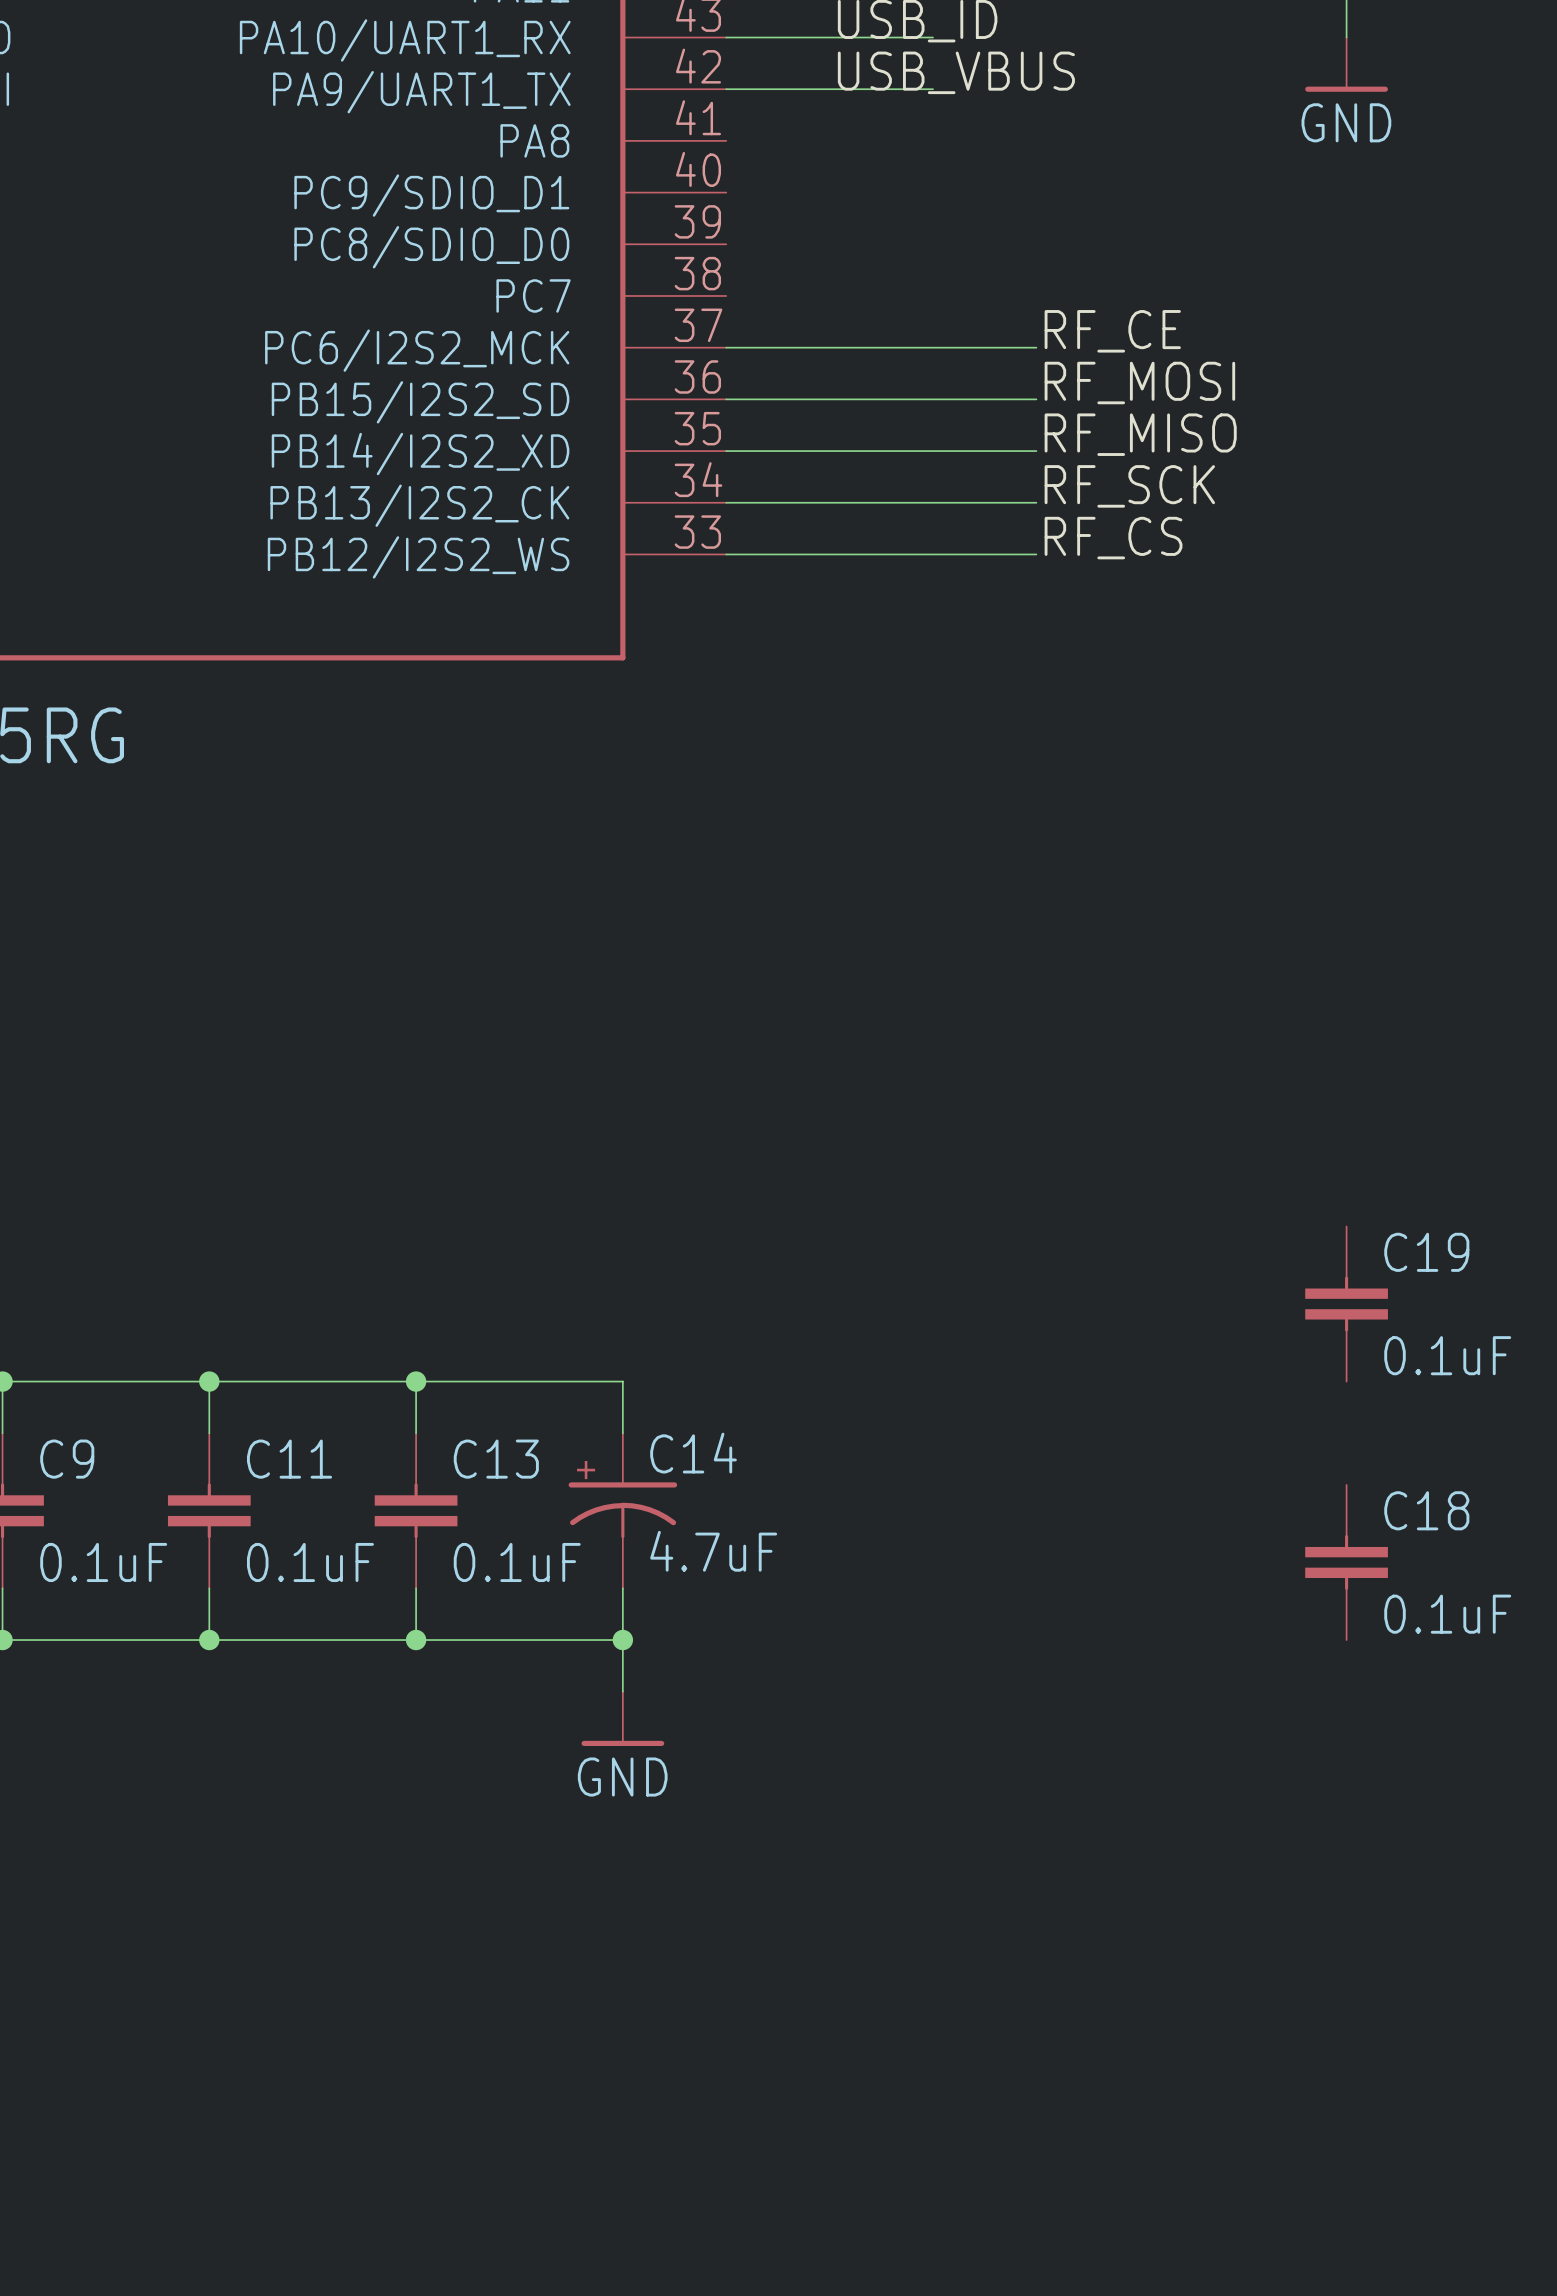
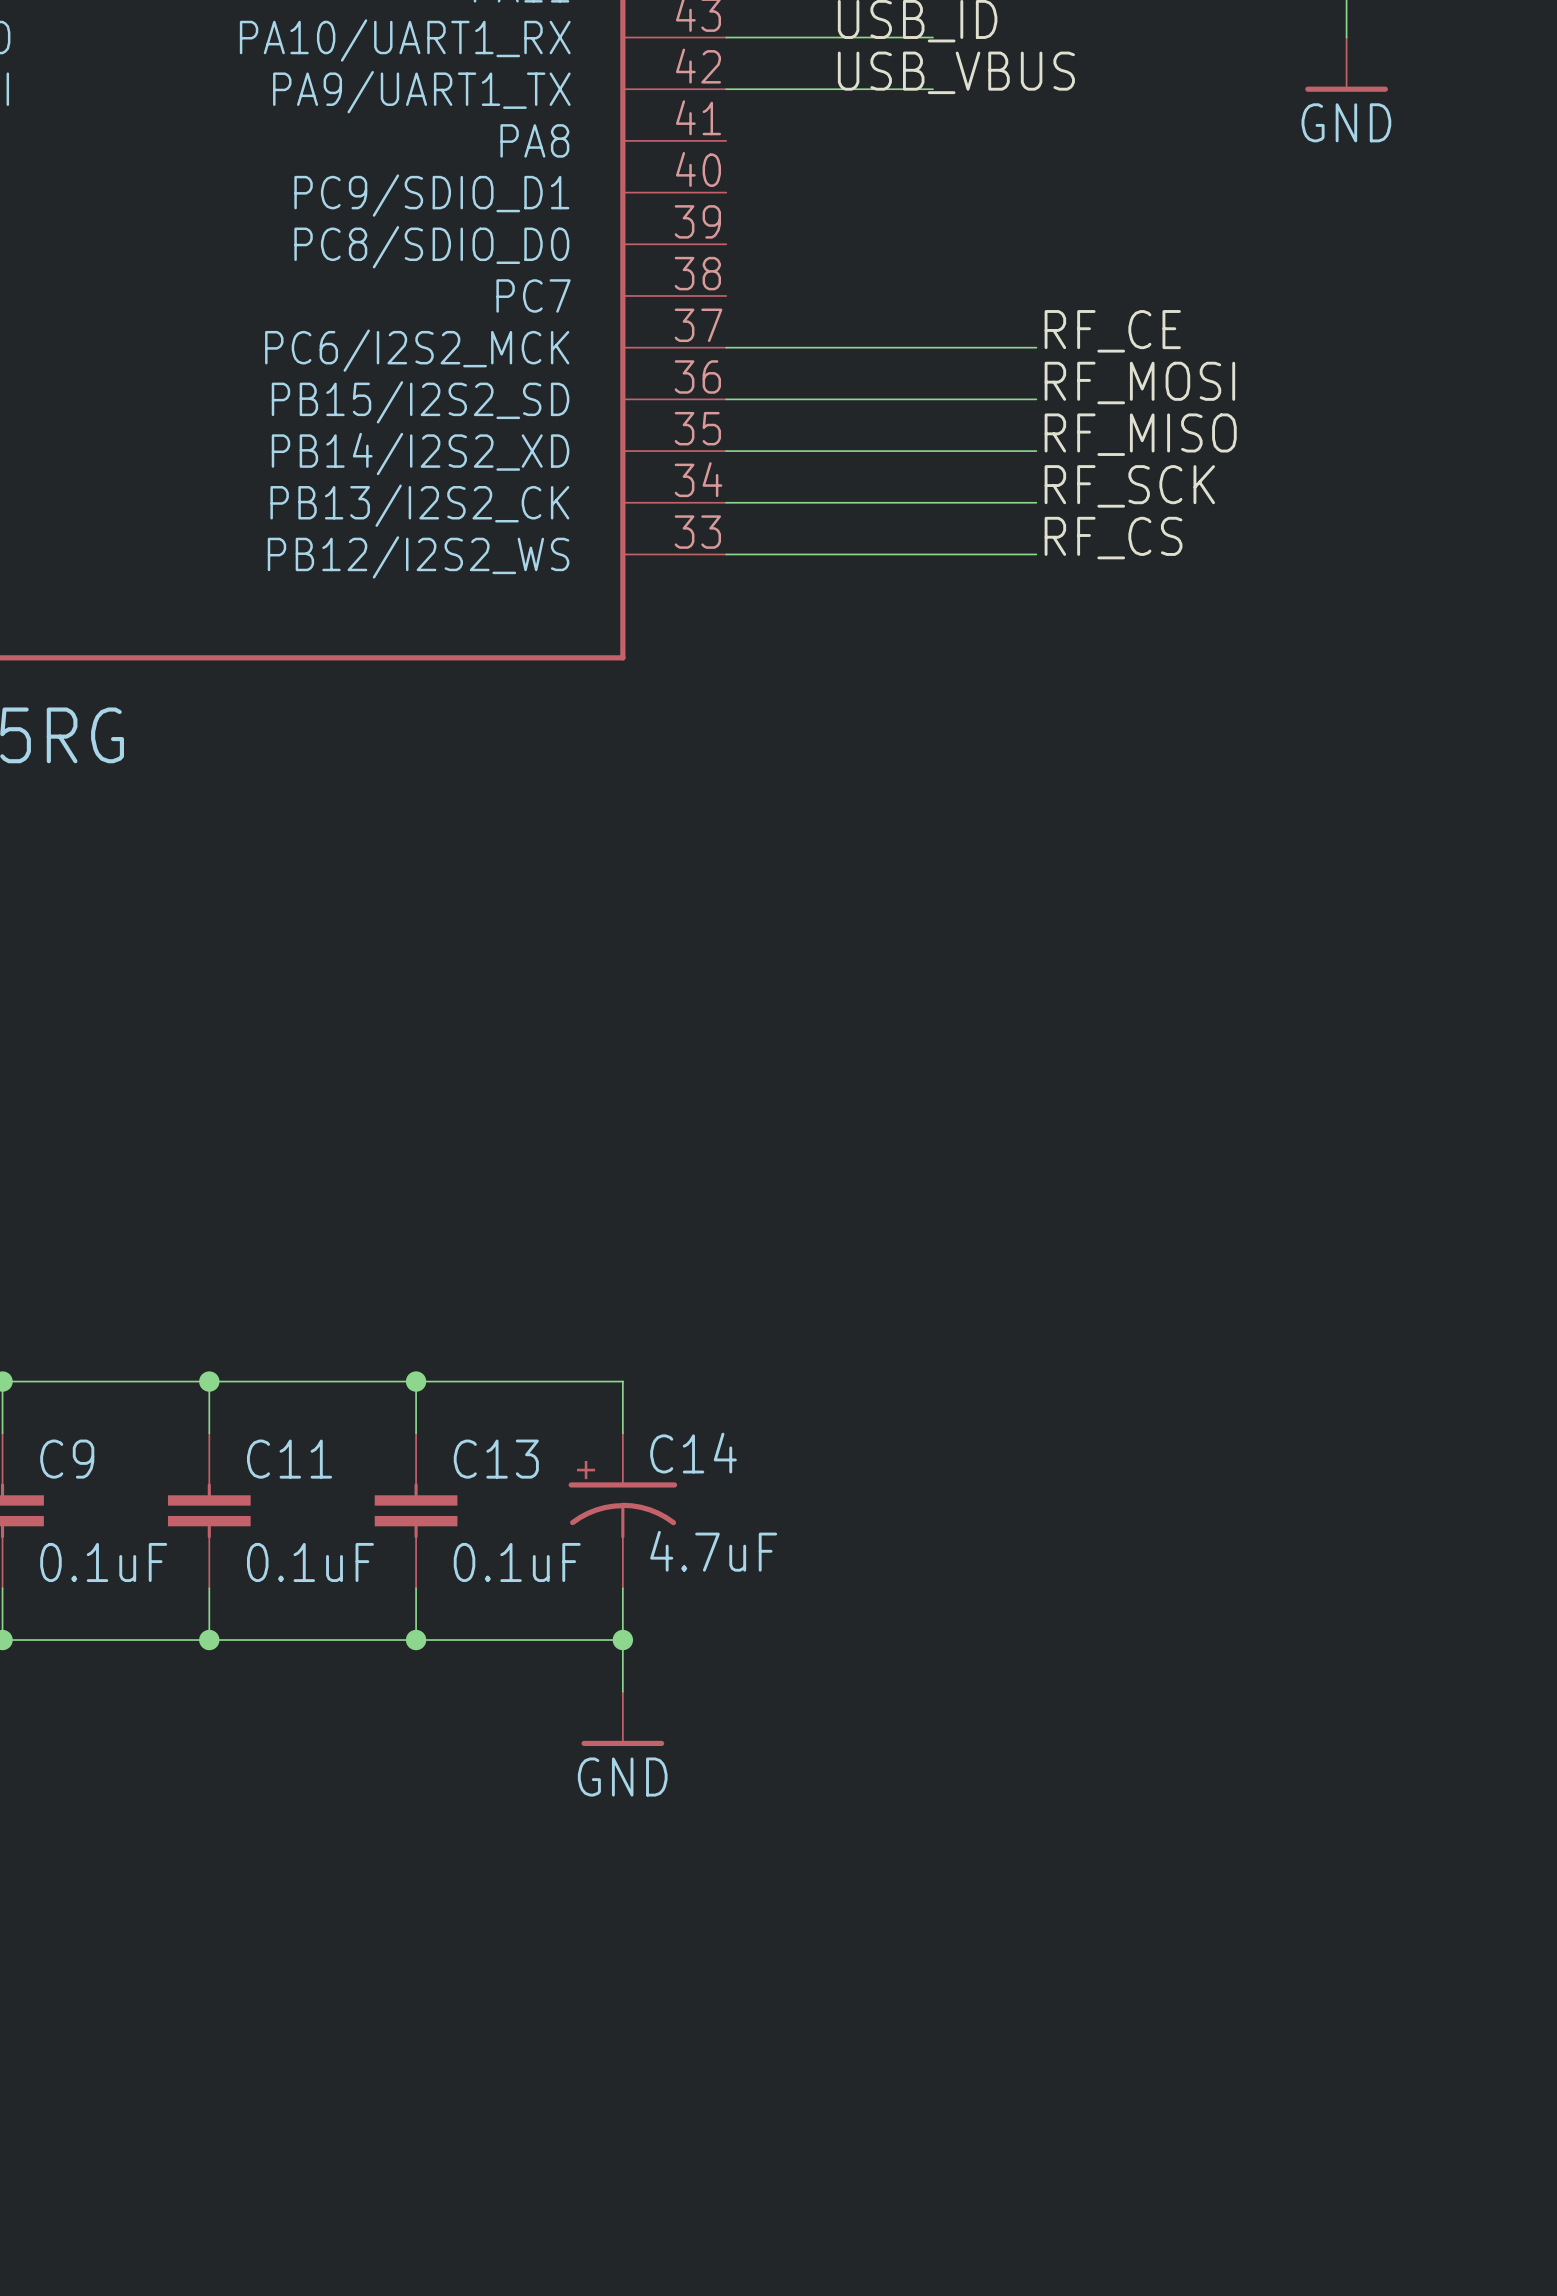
C19: 0.1uF (1346, 1304) -> none
C18: 0.1uF (1346, 1562) -> none

